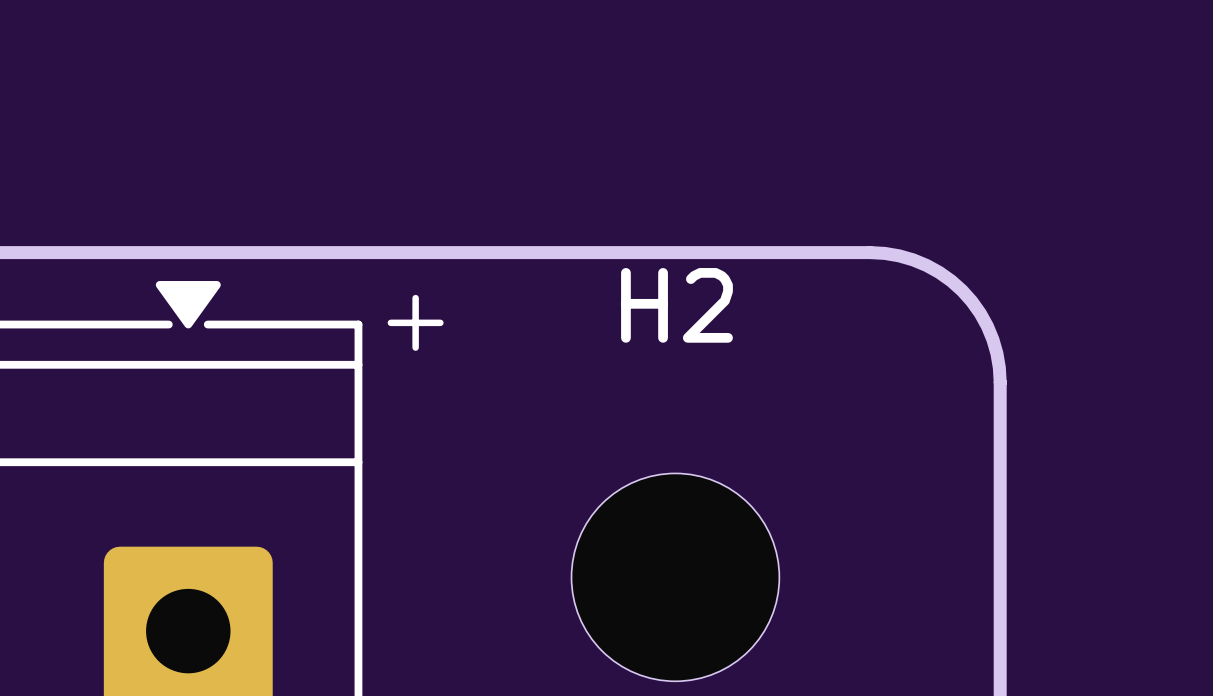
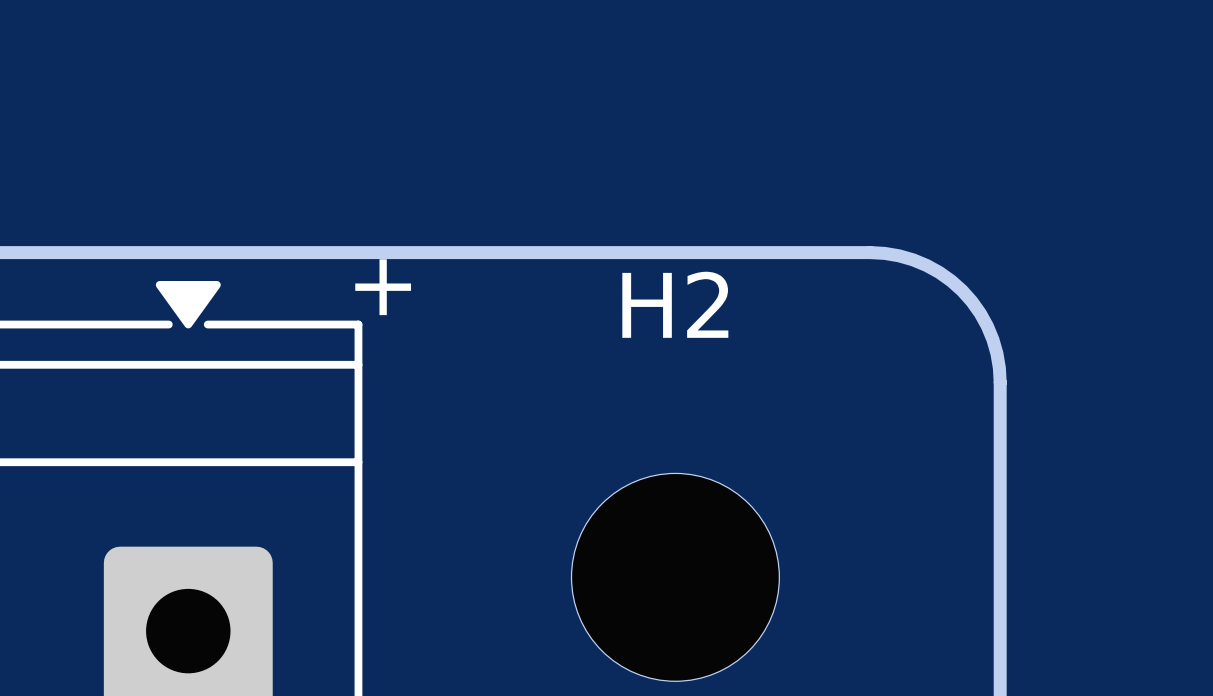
text position: + (415, 322) -> + (383, 287)

